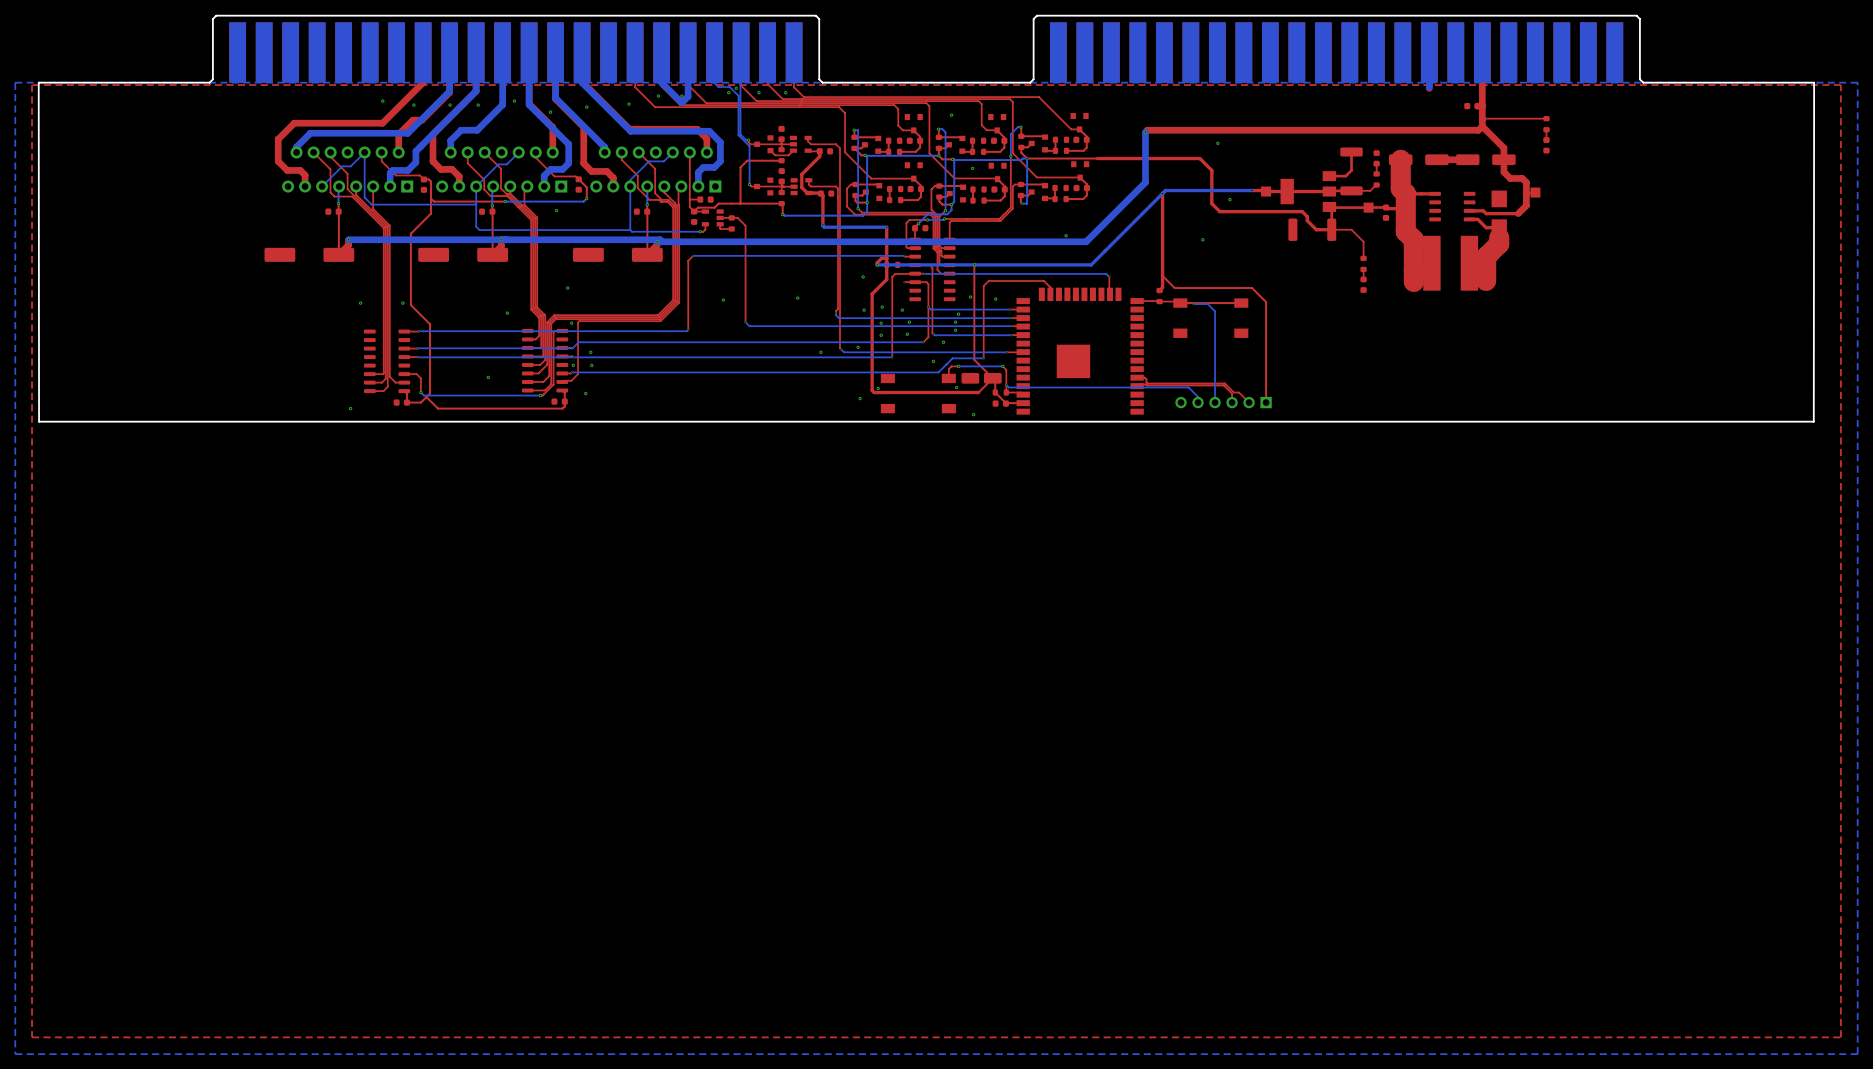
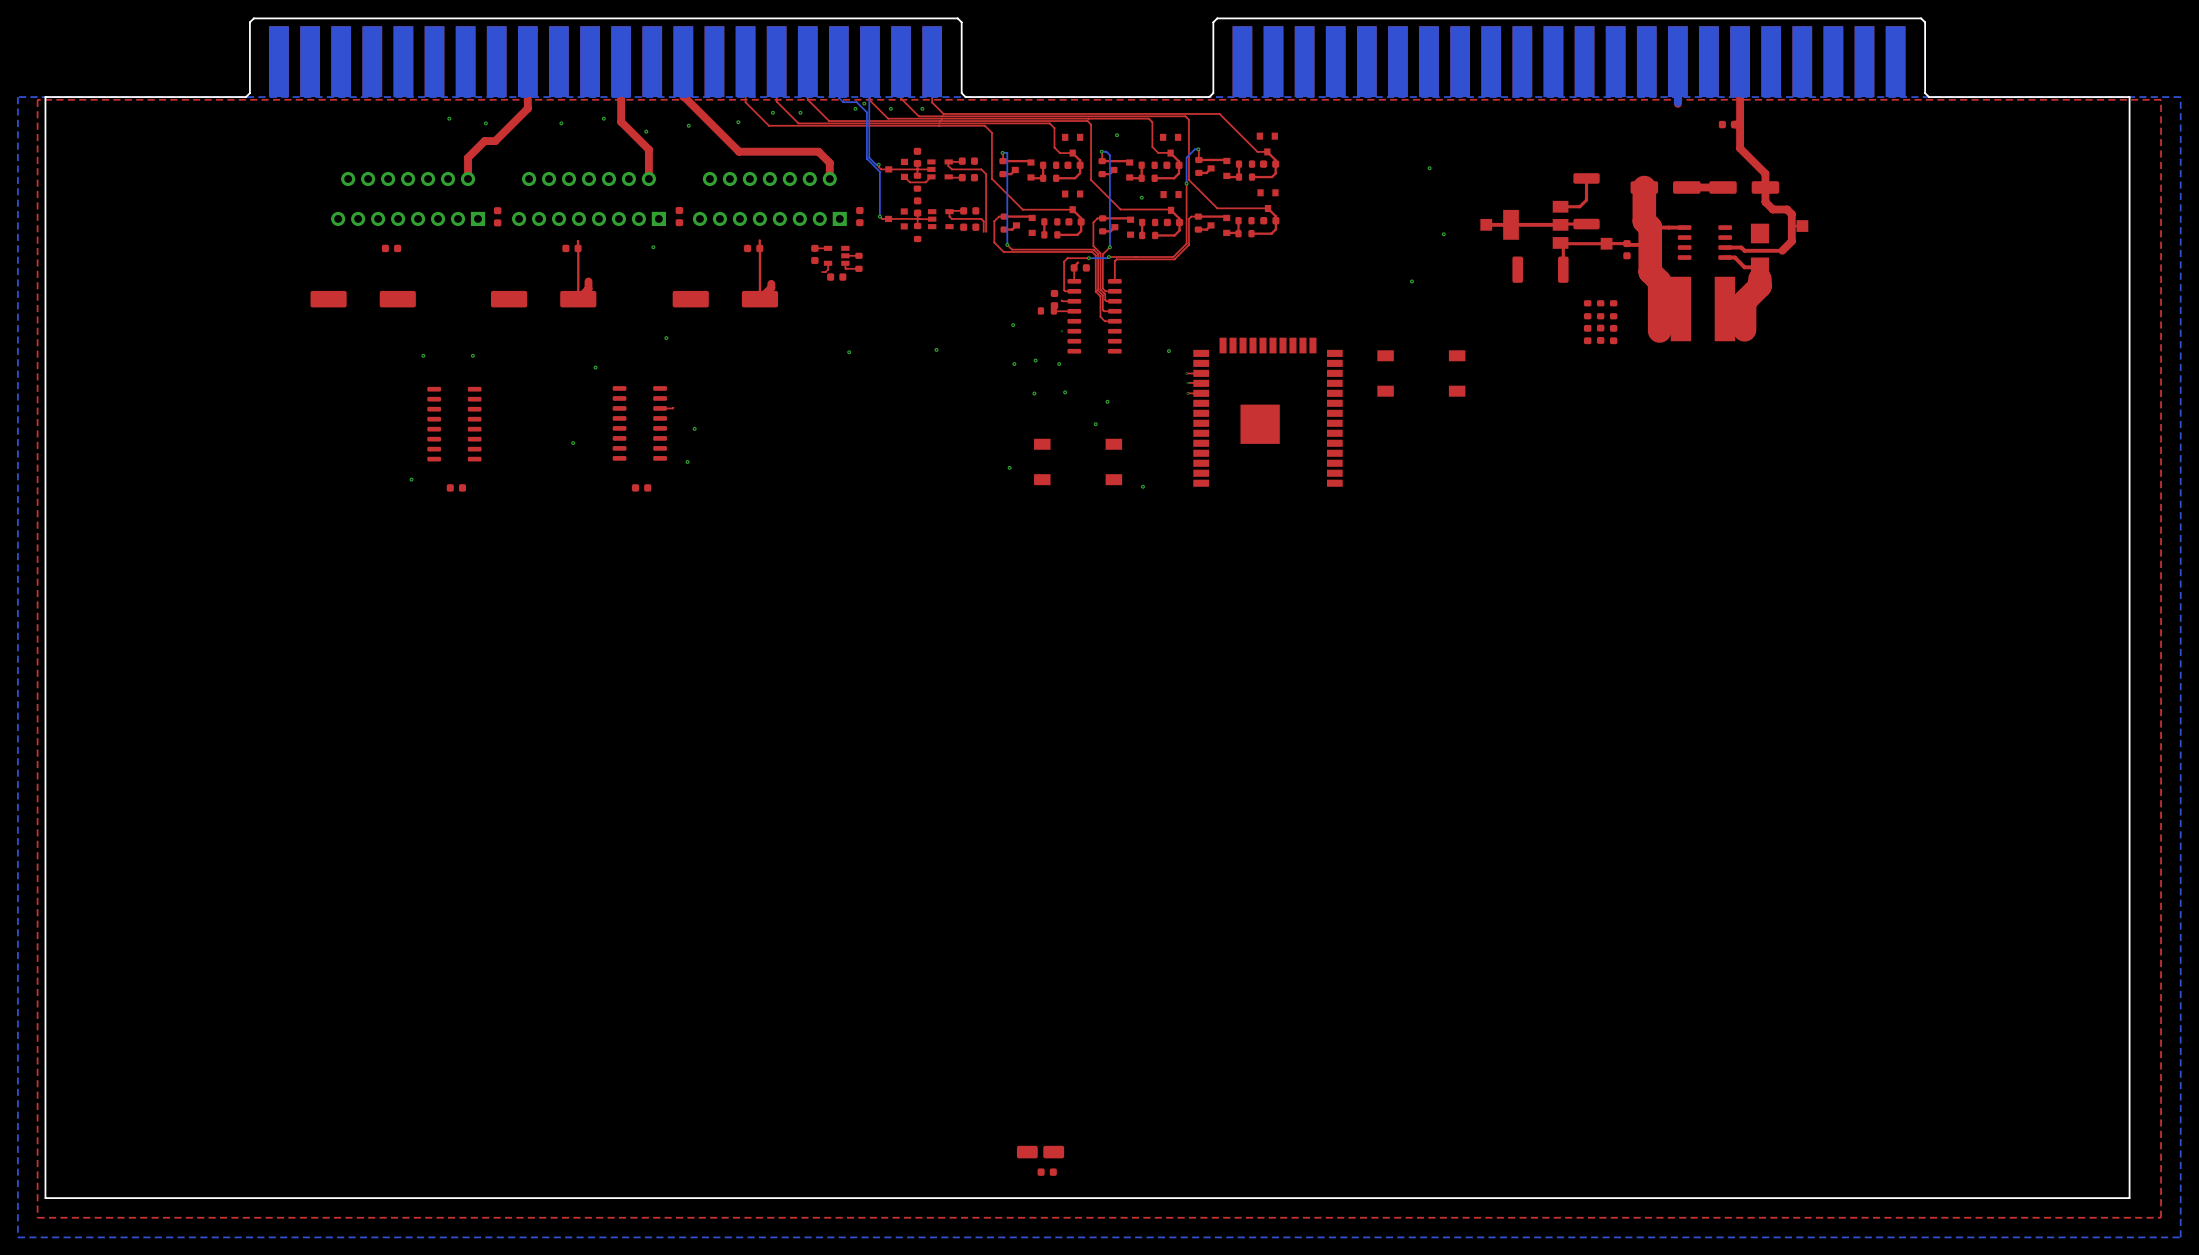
bottom track: (661, 79) (661, 82) (681, 102) (688, 96) (688, 82) -> none
top track: (423, 82) (382, 123) (294, 123) (278, 139) (278, 161) (287, 170) (300, 170) (305, 175) (305, 186) -> none
bottom track: (449, 82) (449, 91) (407, 133) (310, 133) (296, 147) (296, 152) -> none
top track: (476, 82) (476, 91) (432, 134) (432, 161) (441, 169) (452, 169) (459, 176) (459, 186) -> none
bottom track: (476, 82) (476, 91) (415, 151) (415, 162) (407, 170) (392, 170) (390, 173) (390, 186) -> none
bottom track: (502, 82) (502, 104) (477, 130) (461, 130) (450, 140) (450, 152) -> none
bottom track: (529, 82) (529, 104) (568, 144) (568, 163) (562, 169) (550, 169) (544, 175) (544, 186) -> none
top track: (555, 82) (555, 99) (583, 127) (583, 163) (591, 171) (606, 171) (613, 177) (613, 186) -> none
bottom track: (555, 82) (555, 98) (604, 147) (604, 152) -> none
bottom track: (582, 82) (630, 131) (709, 131) (720, 142) (720, 161) (714, 167) (703, 167) (698, 172) (698, 186) -> none
board edge: (1814, 82) (1813, 421) (39, 421) (38, 82) -> (2129, 97) (2129, 1198) (45, 1198) (45, 97)
via: (450, 105) -> none
top track: (1546, 118) (1482, 119) -> none
part: (1546, 124) -> none
top track: (1482, 126) (1478, 130) (1147, 130) (1145, 132) -> none
top track: (1546, 129) (1546, 140) -> none
bottom track: (1145, 132) (1145, 182) (1086, 241) (657, 241) -> none
via: (1145, 132) -> none
top track: none -> (962, 161) (948, 161)
part: none -> (968, 161)
part: (1546, 145) -> none
top track: (1021, 147) (1021, 152) (1027, 158) (1199, 158) (1211, 170) (1211, 203) (1219, 211) (1302, 211) (1307, 216) (1307, 220) (1316, 229) (1351, 229) (1363, 241) (1363, 258) -> none
top track: (854, 148) (861, 155) (865, 155) -> none
top track: (938, 148) (938, 155) (942, 159) (952, 159) -> none
top track: (819, 151) (819, 156) (801, 174) (801, 187) (807, 193) (820, 193) (822, 195) (822, 224) -> none
top track: (313, 152) (330, 169) (330, 192) (334, 196) (352, 196) (383, 228) (383, 373) (369, 374) -> none
top track: (330, 152) (330, 156) (347, 173) (347, 189) (385, 227) (385, 378) (381, 382) (369, 382) -> none
top track: (381, 152) (381, 161) (395, 175) (419, 175) (423, 179) (430, 181) (430, 213) (410, 233) (410, 305) (429, 324) (429, 393) (420, 402) (407, 402) (407, 393) (404, 391) -> none
top track: (467, 152) (467, 163) (484, 179) (484, 189) (490, 196) (507, 196) (531, 220) (531, 309) (539, 317) (539, 335) (535, 339) (527, 339) -> none
top track: (484, 152) (500, 168) (500, 188) (533, 219) (533, 308) (541, 317) (541, 347) (527, 347) -> none
bottom track: (518, 152) (506, 164) (498, 164) (476, 186) (476, 226) (479, 230) (630, 230) -> none
top track: (535, 152) (535, 157) (554, 176) (575, 176) (586, 187) (586, 198) -> none
top track: (621, 152) (621, 159) (637, 175) (637, 188) (649, 199) (667, 201) (673, 207) (673, 300) (658, 315) (554, 315) (547, 322) (547, 364) (538, 373) (527, 373) -> none
top track: (638, 152) (655, 168) (655, 193) (661, 199) (668, 199) (675, 206) (675, 300) (658, 317) (555, 317) (549, 323) (549, 376) (543, 381) (527, 381) -> none
bottom track: (672, 152) (663, 161) (649, 161) (630, 180) (630, 230) -> none
top track: (689, 152) (689, 207) (694, 211) (698, 207) (714, 207) (718, 203) (781, 203) (782, 214) -> none
bottom track: (865, 155) (867, 157) (867, 211) (863, 215) (782, 214) -> none
via: (865, 155) -> none
bottom track: (938, 155) (865, 155) -> none
via: (938, 155) -> none
via: (1027, 158) -> none
part: (1376, 158) -> none
via: (952, 159) -> none
bottom track: (954, 159) (1027, 158) (1027, 203) (1021, 203) -> none
bottom track: (954, 159) (954, 201) (951, 204) (951, 210) (947, 214) (927, 214) (918, 223) -> none
top track: (781, 160) (747, 160) (740, 167) (740, 203) -> none
top track: (1376, 163) (1376, 173) -> none
top track: none -> (963, 210) (950, 210)
part: none -> (969, 210)
part: (1376, 179) -> none
part: none -> (859, 216)
top track: (1376, 185) (1370, 190) (1351, 190) -> none
bottom track: (322, 186) (342, 166) (350, 166) (364, 152) (364, 197) (371, 204) (476, 204) -> none
bottom track: (339, 186) (338, 203) -> none
top track: (356, 186) (356, 194) (387, 226) (387, 386) (383, 391) (369, 391) -> none
top track: (373, 186) (373, 209) (389, 225) (389, 376) (395, 382) (404, 382) -> none
bottom track: (493, 186) (492, 205) -> none
top track: (510, 186) (510, 193) (535, 218) (535, 308) (543, 316) (543, 356) (527, 356) -> none
top track: (527, 186) (524, 189) (524, 204) (537, 217) (537, 307) (545, 315) (545, 360) (540, 364) (527, 364) -> none
bottom track: (647, 186) (647, 204) -> none
top track: (664, 186) (664, 192) (677, 205) (677, 301) (659, 319) (555, 319) (551, 323) (551, 384) (544, 390) (527, 390) -> none
top track: (681, 186) (678, 189) (679, 302) (660, 321) (579, 321) (578, 374) (571, 380) (562, 381) -> none
top track: (1252, 190) (1266, 191) -> none
bottom track: (1252, 190) (1165, 190) (1091, 264) (877, 264) -> none
via: (1252, 190) -> none
top track: (1162, 193) (1162, 287) (1159, 290) -> none
via: (1162, 193) -> none
top track: (855, 195) (857, 202) (867, 202) -> none
top track: (1020, 195) (1021, 203) -> none
top track: (837, 197) (837, 309) (835, 313) -> none
top track: (840, 197) (841, 349) -> none
top track: (939, 197) (939, 201) (942, 204) (951, 204) -> none
top track: (430, 198) (434, 201) (505, 201) -> none
bottom track: (586, 198) (583, 201) (505, 201) -> none
via: (586, 198) -> none
top track: (689, 199) (700, 199) -> none
part: (705, 199) -> none
via: (505, 201) -> none
via: (867, 202) -> none
top track: (338, 203) (338, 254) (348, 245) (348, 239) -> none
via: (338, 203) -> none
via: (1021, 203) -> none
via: (647, 204) -> none
via: (951, 204) -> none
via: (492, 205) -> none
via: (782, 214) -> none
top track: (731, 217) (737, 217) (745, 225) (745, 322) -> none
via: (918, 223) -> none
bottom track: (822, 224) (824, 227) (886, 227) -> none
via: (822, 224) -> none
top track: (886, 227) (886, 279) (872, 294) (872, 390) (874, 392) (978, 392) (992, 378) -> none
via: (886, 227) -> none
bottom track: (630, 230) (631, 231) (700, 231) -> none
via: (700, 231) -> none
via: (1066, 235) -> none
part: none -> (836, 277)
bottom track: (348, 239) (660, 239) (662, 241) -> none
via: (348, 239) -> none
via: (501, 239) -> none
via: (657, 241) -> none
top track: (693, 255) (688, 260) (688, 330) -> none
via: (693, 255) -> none
part: none -> (1054, 299)
bottom track: (904, 255) (693, 255) -> none
via: (904, 255) -> none
top track: (886, 258) (881, 258) (877, 264) -> none
part: none -> (1587, 309)
part: none -> (1613, 309)
via: (877, 264) -> none
top track: (974, 264) (974, 359) (995, 380) (995, 392) (1005, 403) (1023, 403) -> none
via: (974, 264) -> none
top track: (915, 265) (929, 265) (932, 267) (933, 334) -> none
top track: (1363, 269) (1363, 279) -> none
top track: (924, 273) (895, 273) (892, 276) (892, 357) -> none
bottom track: (924, 273) (1106, 273) (1109, 275) -> none
via: (924, 273) -> none
top track: (1109, 275) (1109, 294) -> none
via: (1109, 275) -> none
top track: (1162, 275) (1174, 288) (1252, 288) (1266, 302) (1266, 402) -> none
top track: (904, 282) (926, 282) (928, 283) (928, 337) (923, 342) -> none
part: none -> (1587, 334)
part: none -> (1613, 334)
top track: (1050, 294) (1050, 287) (1044, 280) (988, 280) (983, 286) (983, 358) -> none
part: (1159, 296) -> none
via: (970, 297) -> none
top track: (1137, 301) (1180, 303) -> none
top track: (1241, 303) (1180, 303) -> none
bottom track: (1193, 304) (1207, 304) (1215, 311) (1215, 402) -> none
via: (1193, 304) -> none
bottom track: (928, 307) (930, 309) (1010, 309) -> none
via: (928, 307) -> none
via: (1010, 309) -> none
top track: (1023, 309) (1010, 309) -> none
bottom track: (835, 313) (838, 318) (1010, 318) -> none
via: (835, 313) -> none
via: (958, 314) -> none
bottom track: (745, 322) (749, 326) (1011, 326) -> none
via: (745, 322) -> none
via: (909, 322) -> none
via: (955, 322) -> none
via: (571, 323) -> none
via: (881, 323) -> none
top track: (562, 330) (553, 332) (553, 384) (540, 395) -> none
bottom track: (688, 330) (418, 331) -> none
via: (688, 330) -> none
via: (955, 330) -> none
top track: (418, 331) (404, 331) -> none
via: (418, 331) -> none
bottom track: (933, 334) (1011, 335) -> none
via: (933, 334) -> none
bottom track: (923, 342) (578, 342) (572, 348) (417, 348) -> none
via: (923, 342) -> none
via: (573, 347) -> none
via: (858, 347) -> none
top track: (417, 348) (404, 348) -> none
via: (417, 348) -> none
bottom track: (841, 349) (844, 352) (1006, 352) -> none
via: (841, 349) -> none
via: (590, 352) -> none
via: (820, 352) -> none
via: (1006, 352) -> none
top track: (1023, 352) (1006, 352) -> none
top track: (562, 356) (573, 357) -> none
top track: (404, 357) (417, 357) -> none
via: (417, 357) -> none
via: (573, 357) -> none
bottom track: (892, 357) (417, 357) -> none
via: (892, 357) -> none
bottom track: (983, 358) (952, 358) (938, 372) (571, 372) -> none
via: (983, 358) -> none
via: (573, 365) -> none
top track: (958, 366) (951, 366) (948, 369) (948, 378) -> none
via: (958, 366) -> none
top track: (1002, 366) (1006, 369) (1006, 392) (1021, 392) (1023, 394) -> none
bottom track: (1002, 366) (958, 366) -> none
via: (1002, 366) -> none
top track: (571, 372) (562, 373) -> none
via: (571, 372) -> none
top track: (404, 374) (416, 374) (420, 378) (420, 392) -> none
top track: (1137, 377) (1144, 377) (1147, 383) (1224, 383) (1233, 392) (1239, 392) (1249, 402) -> none
part: (981, 378) -> none
bottom track: (1006, 384) (1008, 387) (1188, 387) (1198, 396) (1198, 402) -> none
via: (1006, 384) -> none
top track: (1137, 386) (1138, 384) (1223, 385) (1232, 393) (1232, 402) -> none
via: (956, 387) -> none
via: (878, 388) -> none
top track: (562, 390) (564, 393) (564, 406) (562, 408) (438, 408) (426, 397) -> none
bottom track: (420, 392) (423, 395) (540, 395) -> none
via: (420, 392) -> none
part: (1000, 392) -> none
via: (540, 395) -> none
part position: (559, 401) -> (641, 487)
part position: (401, 402) -> (456, 487)
part: (1223, 402) -> none
part: (1000, 403) -> none
part: none -> (1040, 1152)
part: none -> (1047, 1172)

